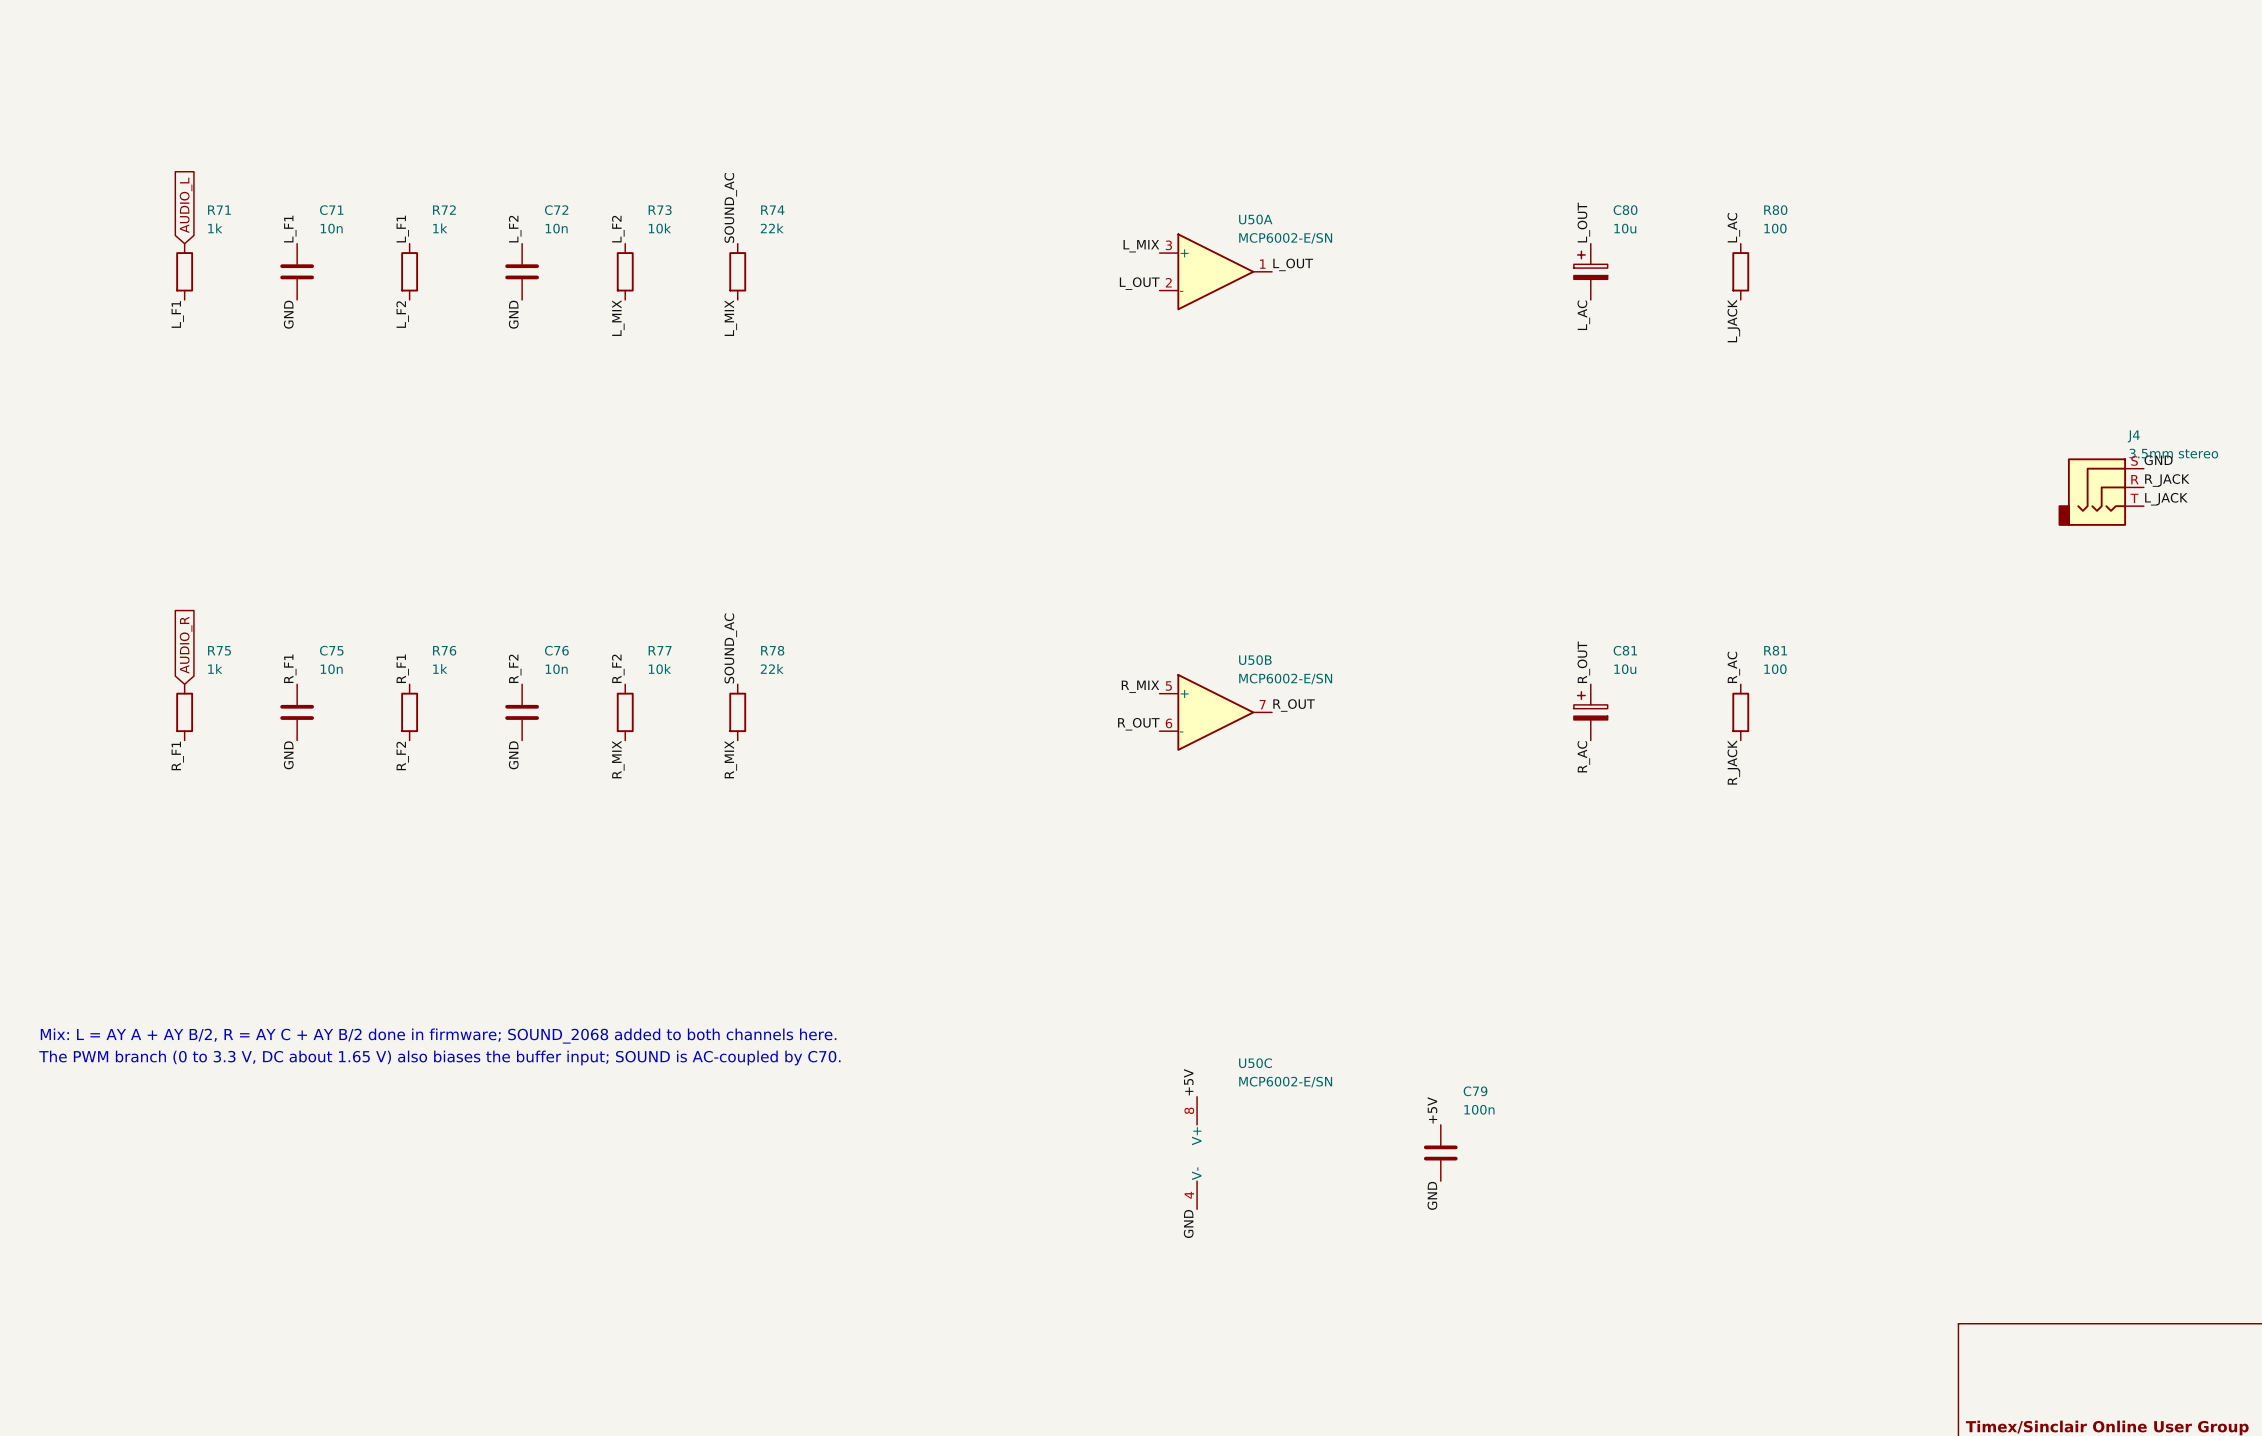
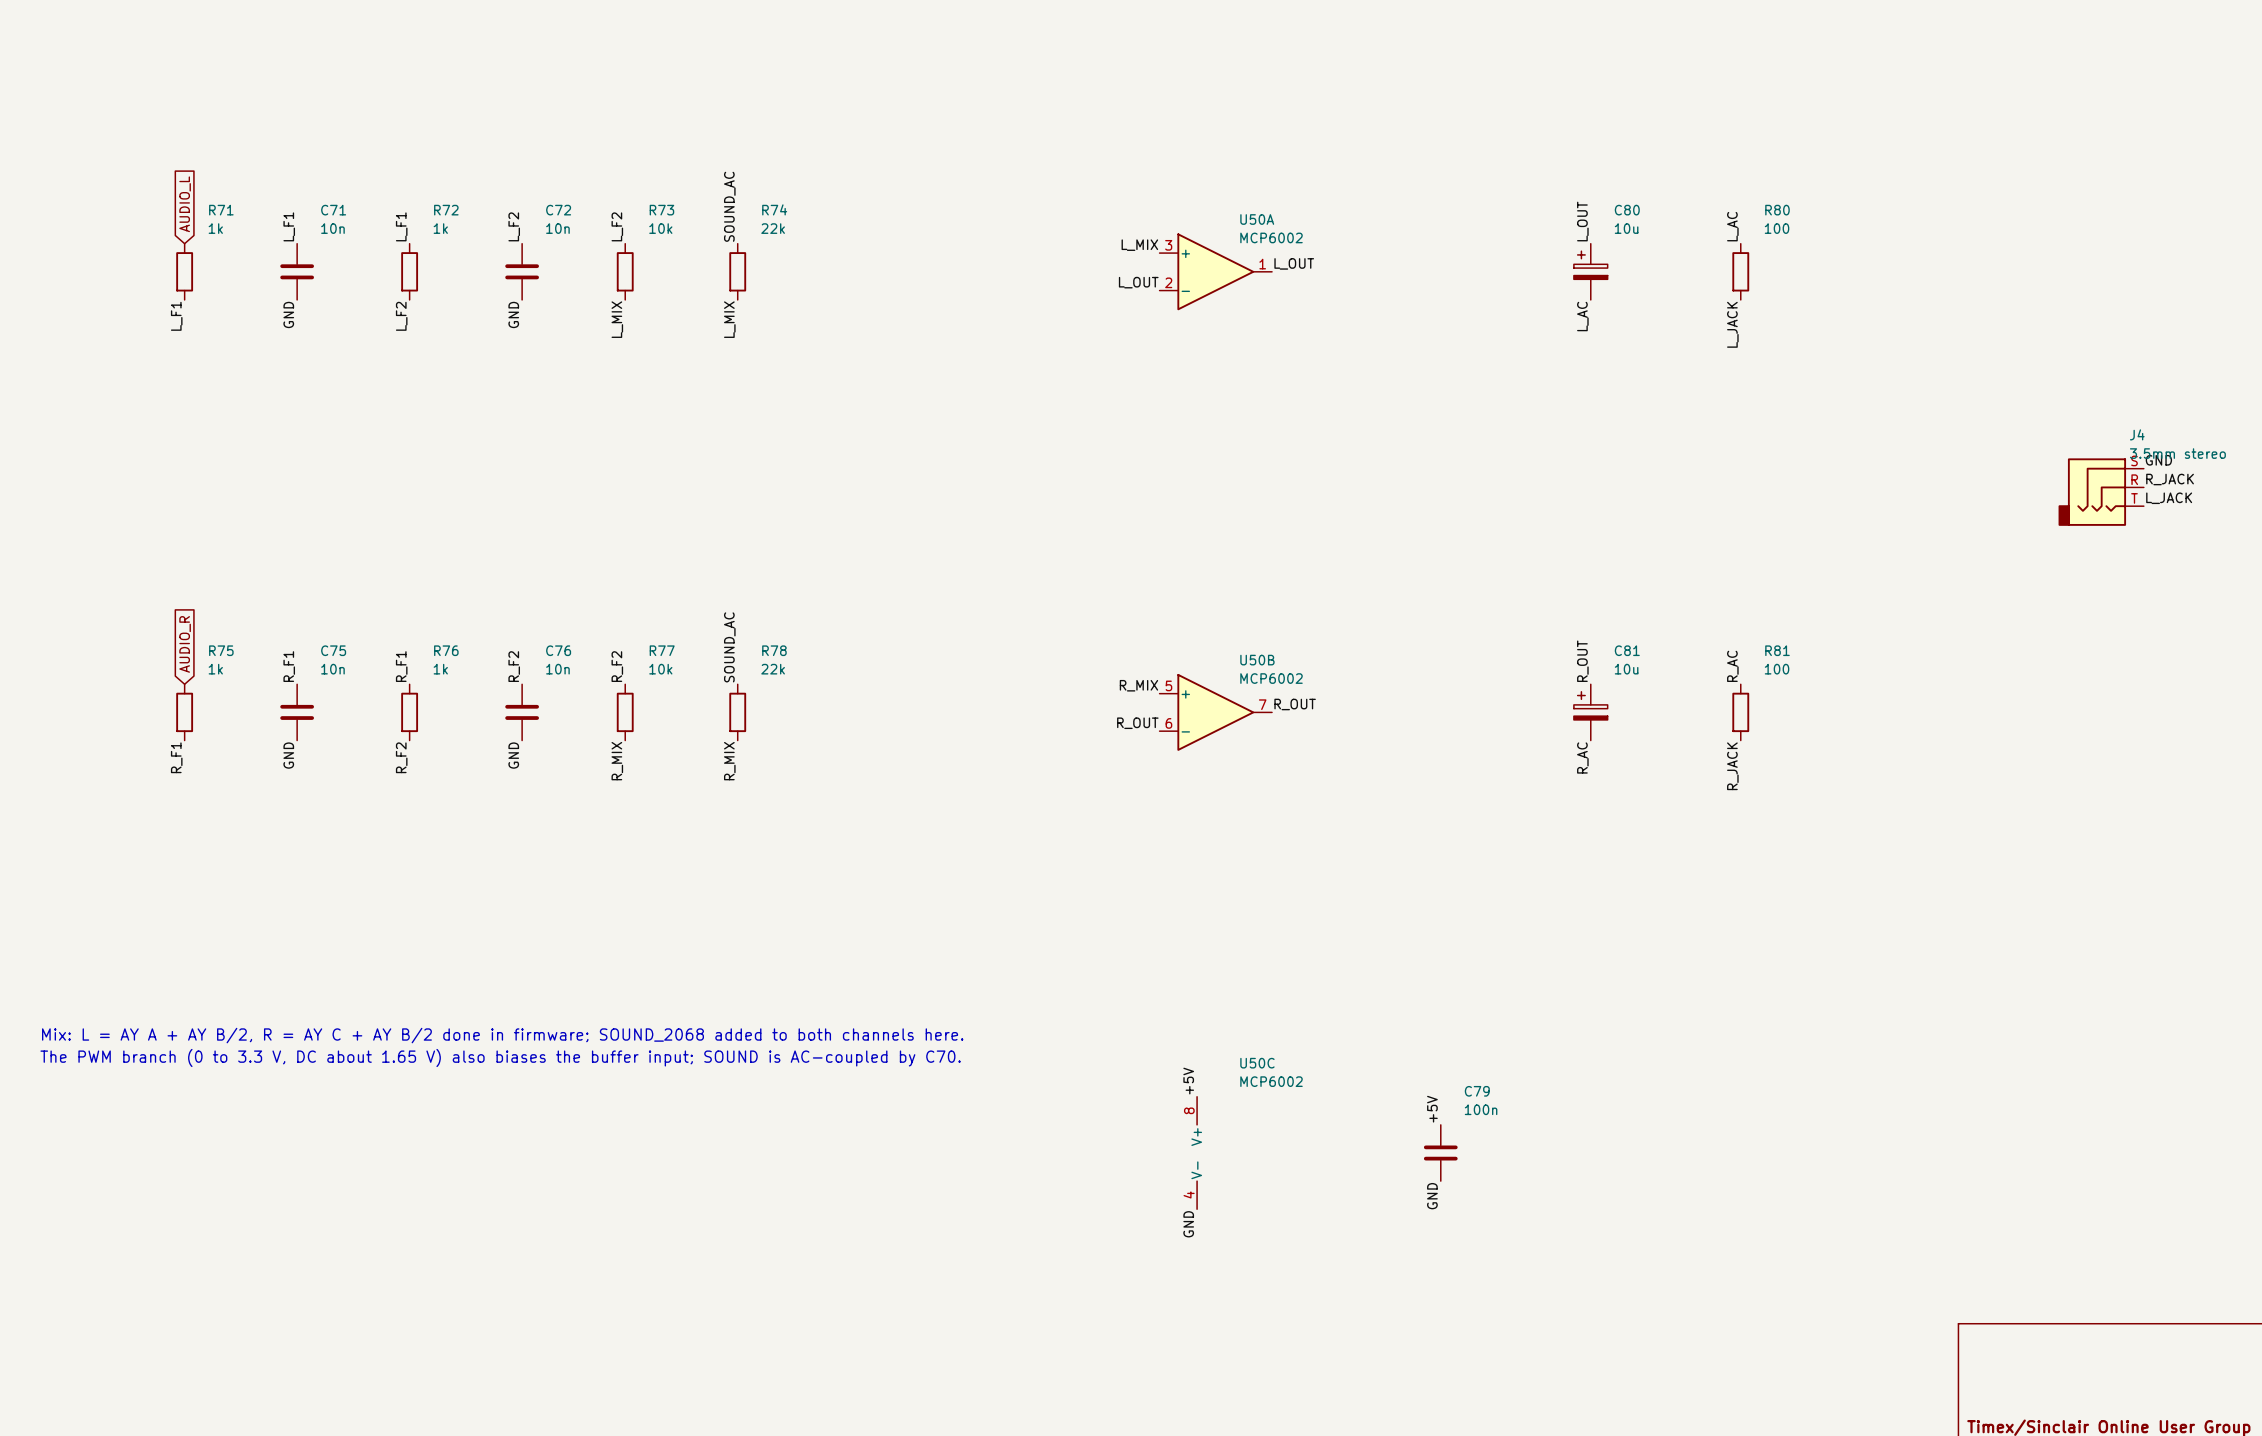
U50A value: MCP6002-E/SN (1285, 238) -> MCP6002 (1271, 237)
U50B value: MCP6002-E/SN (1285, 679) -> MCP6002 (1271, 678)
U50C value: MCP6002-E/SN (1285, 1082) -> MCP6002 (1271, 1081)

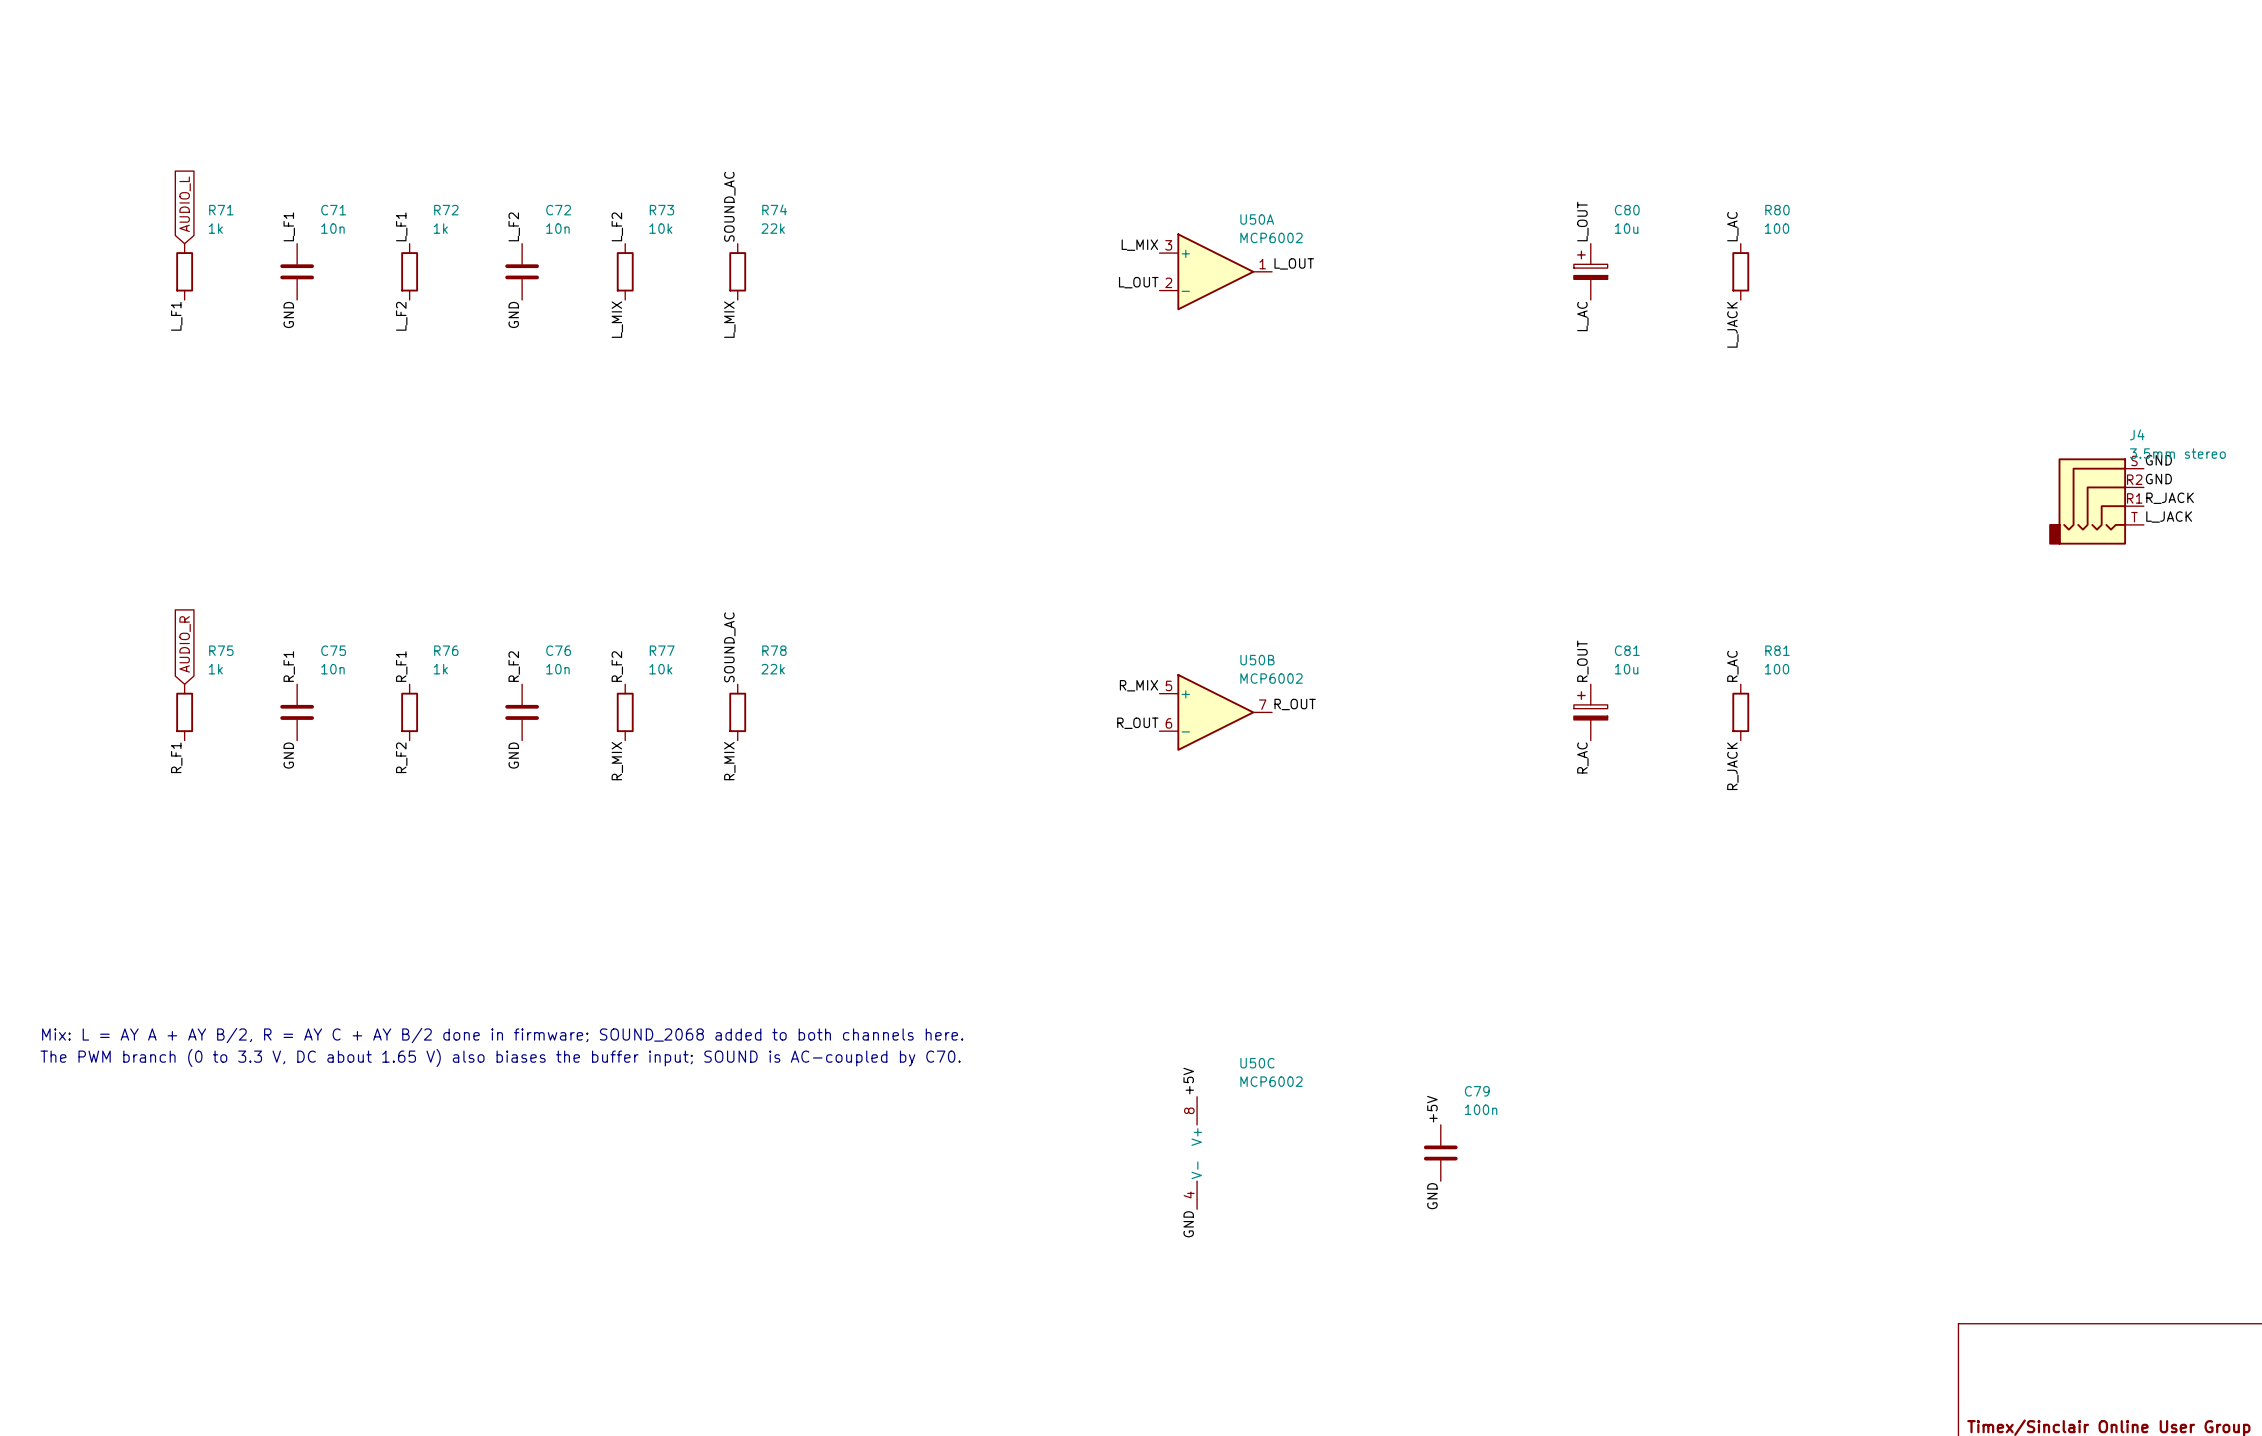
J4 symbol: [2058, 458, 2144, 526] -> [2049, 458, 2144, 545]
label: R_JACK (2170, 479) -> GND (2158, 479)
label: L_JACK (2169, 498) -> R_JACK (2170, 498)
label: none -> L_JACK (2169, 517)

